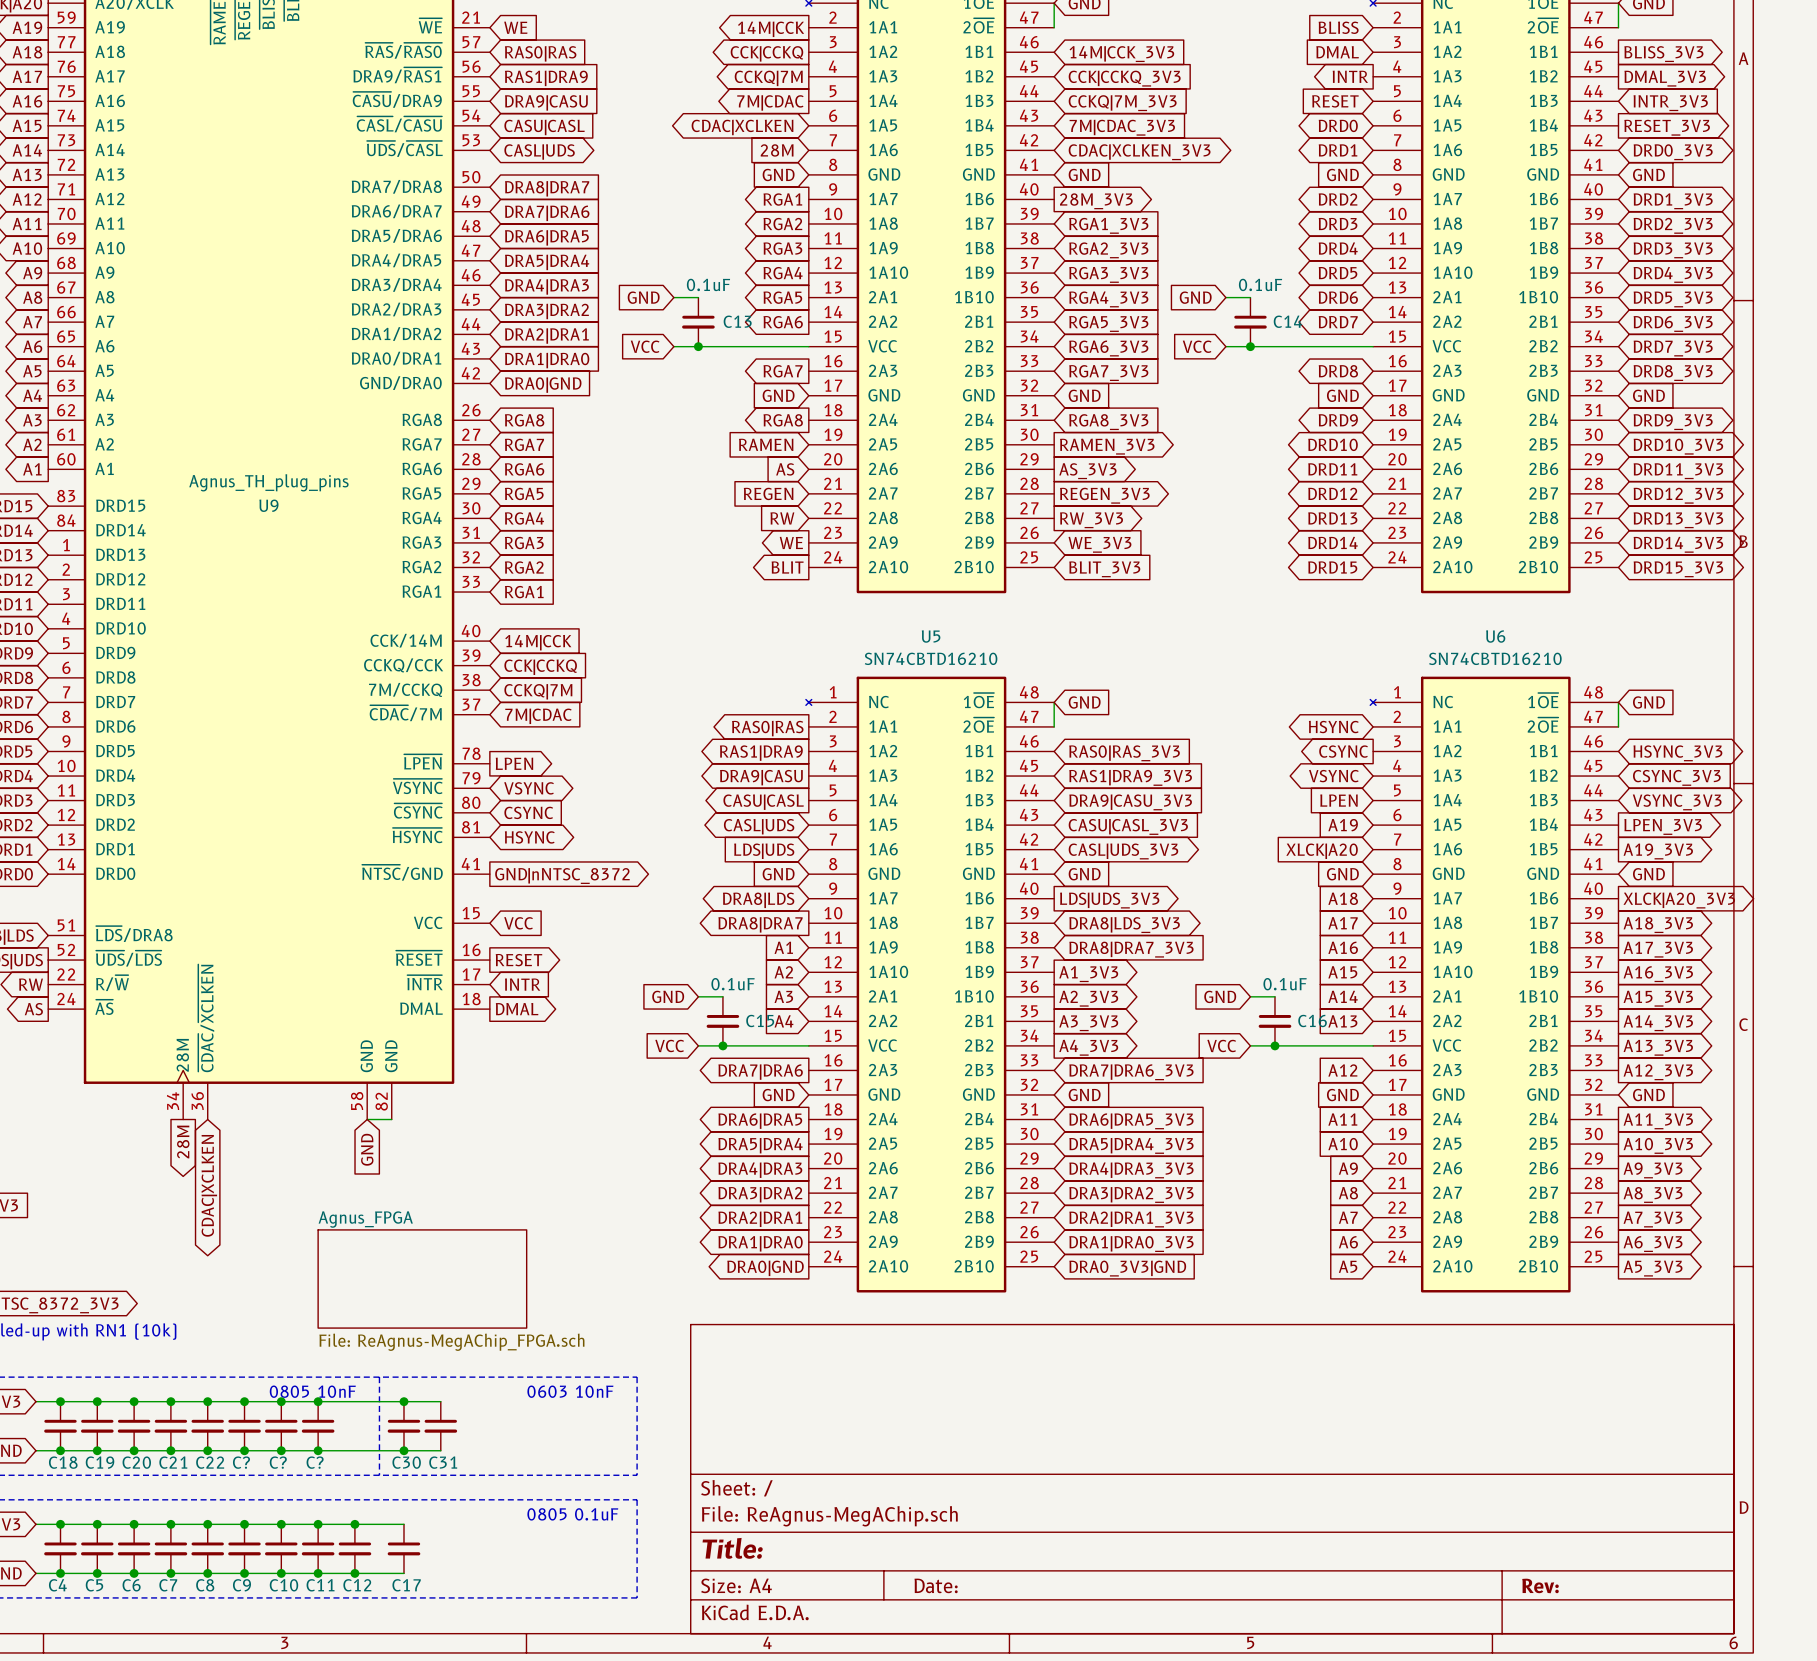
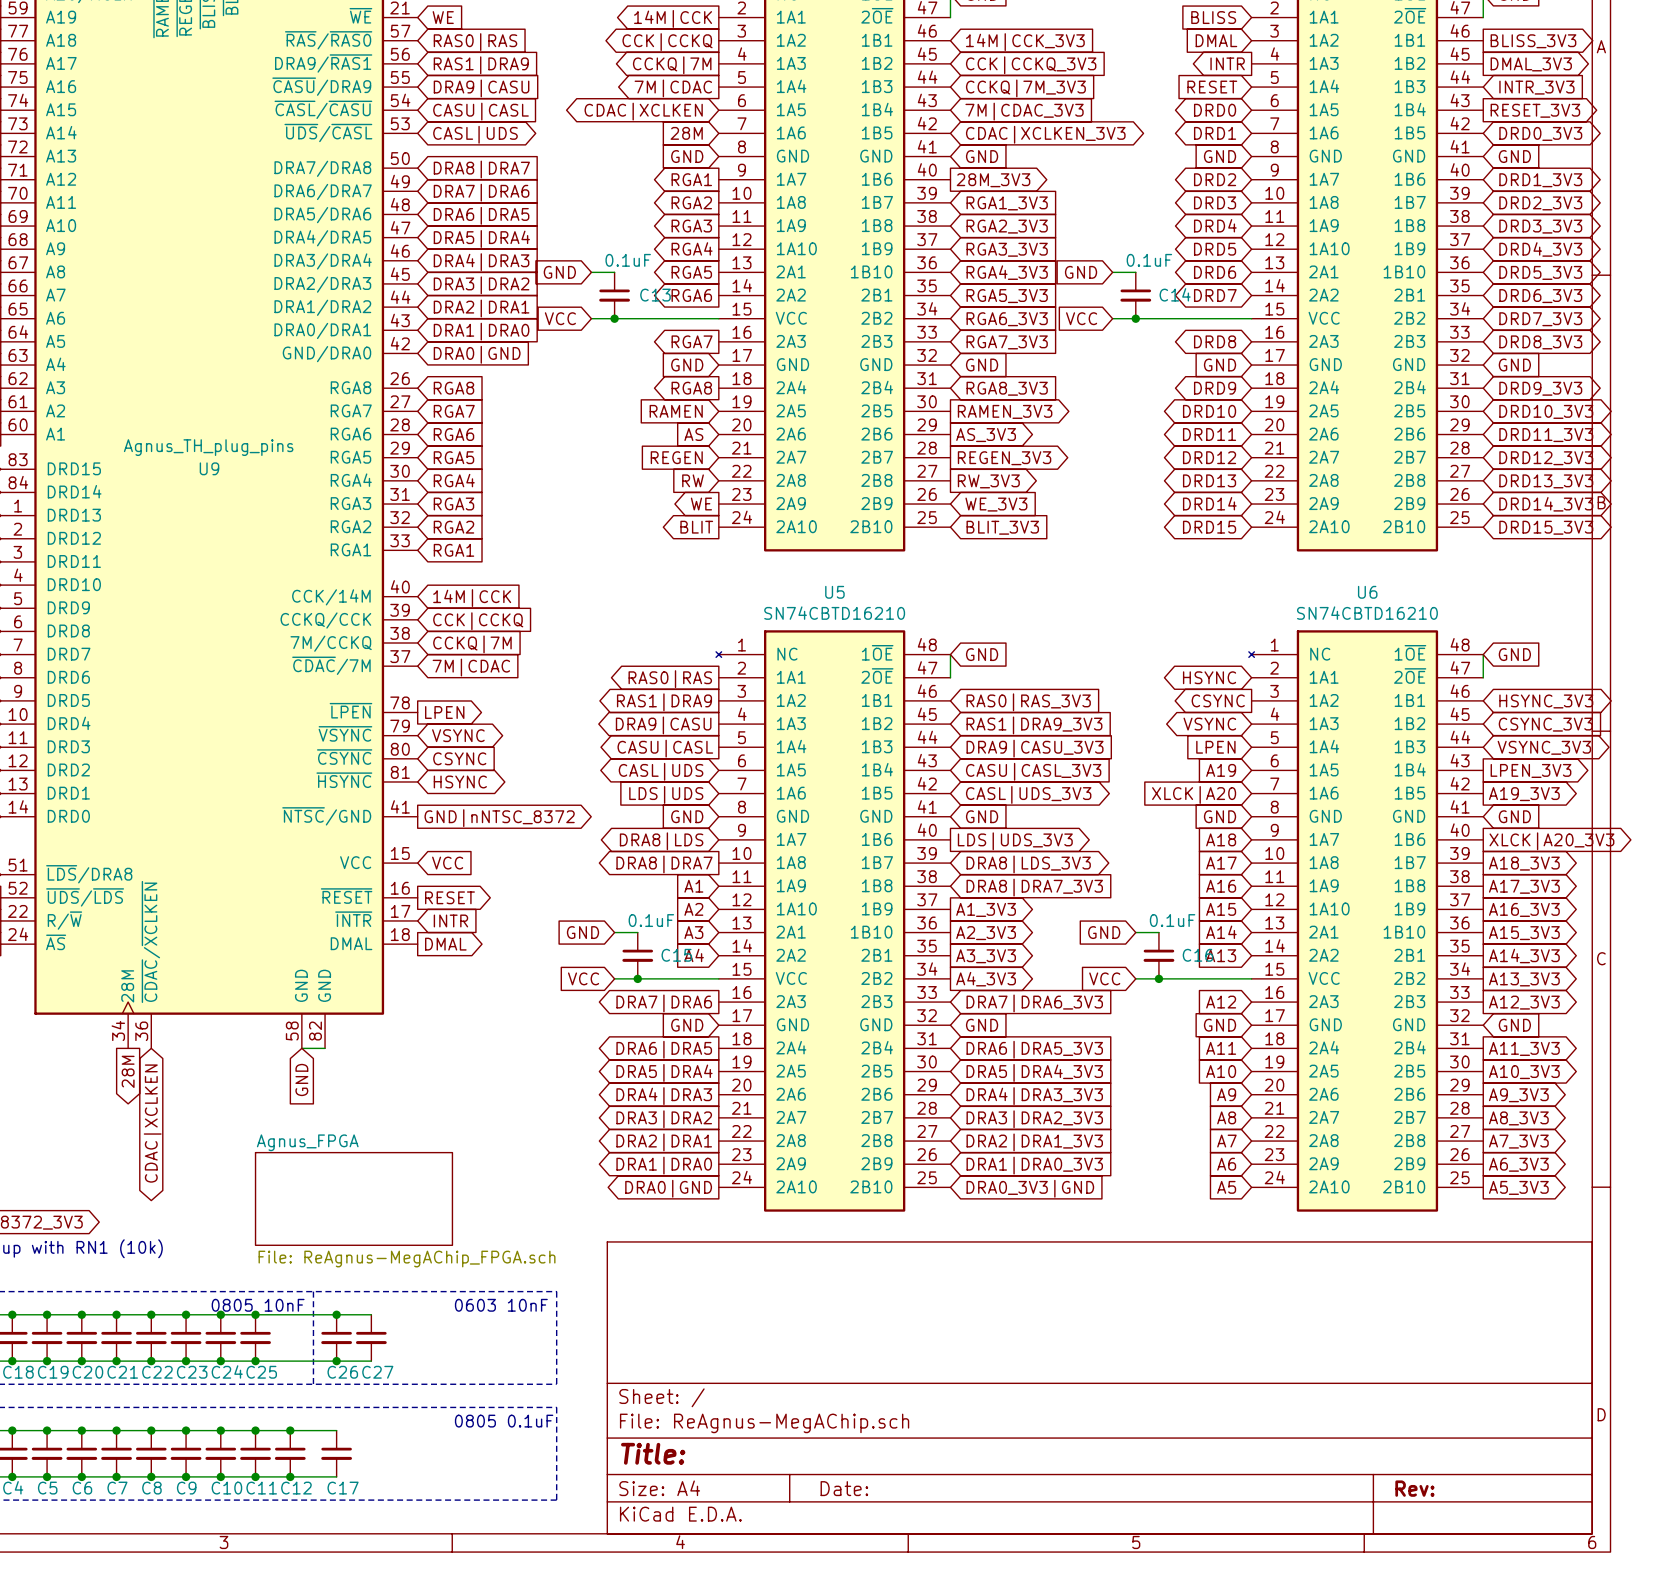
C? name: C? (241, 1462) -> C23 (192, 1372)
C? name: C? (278, 1462) -> C24 (227, 1371)
C? name: C? (315, 1462) -> C25 (261, 1372)
C30 name: C30 (406, 1462) -> C26 (342, 1372)
C31 name: C31 (443, 1462) -> C27 (377, 1372)

